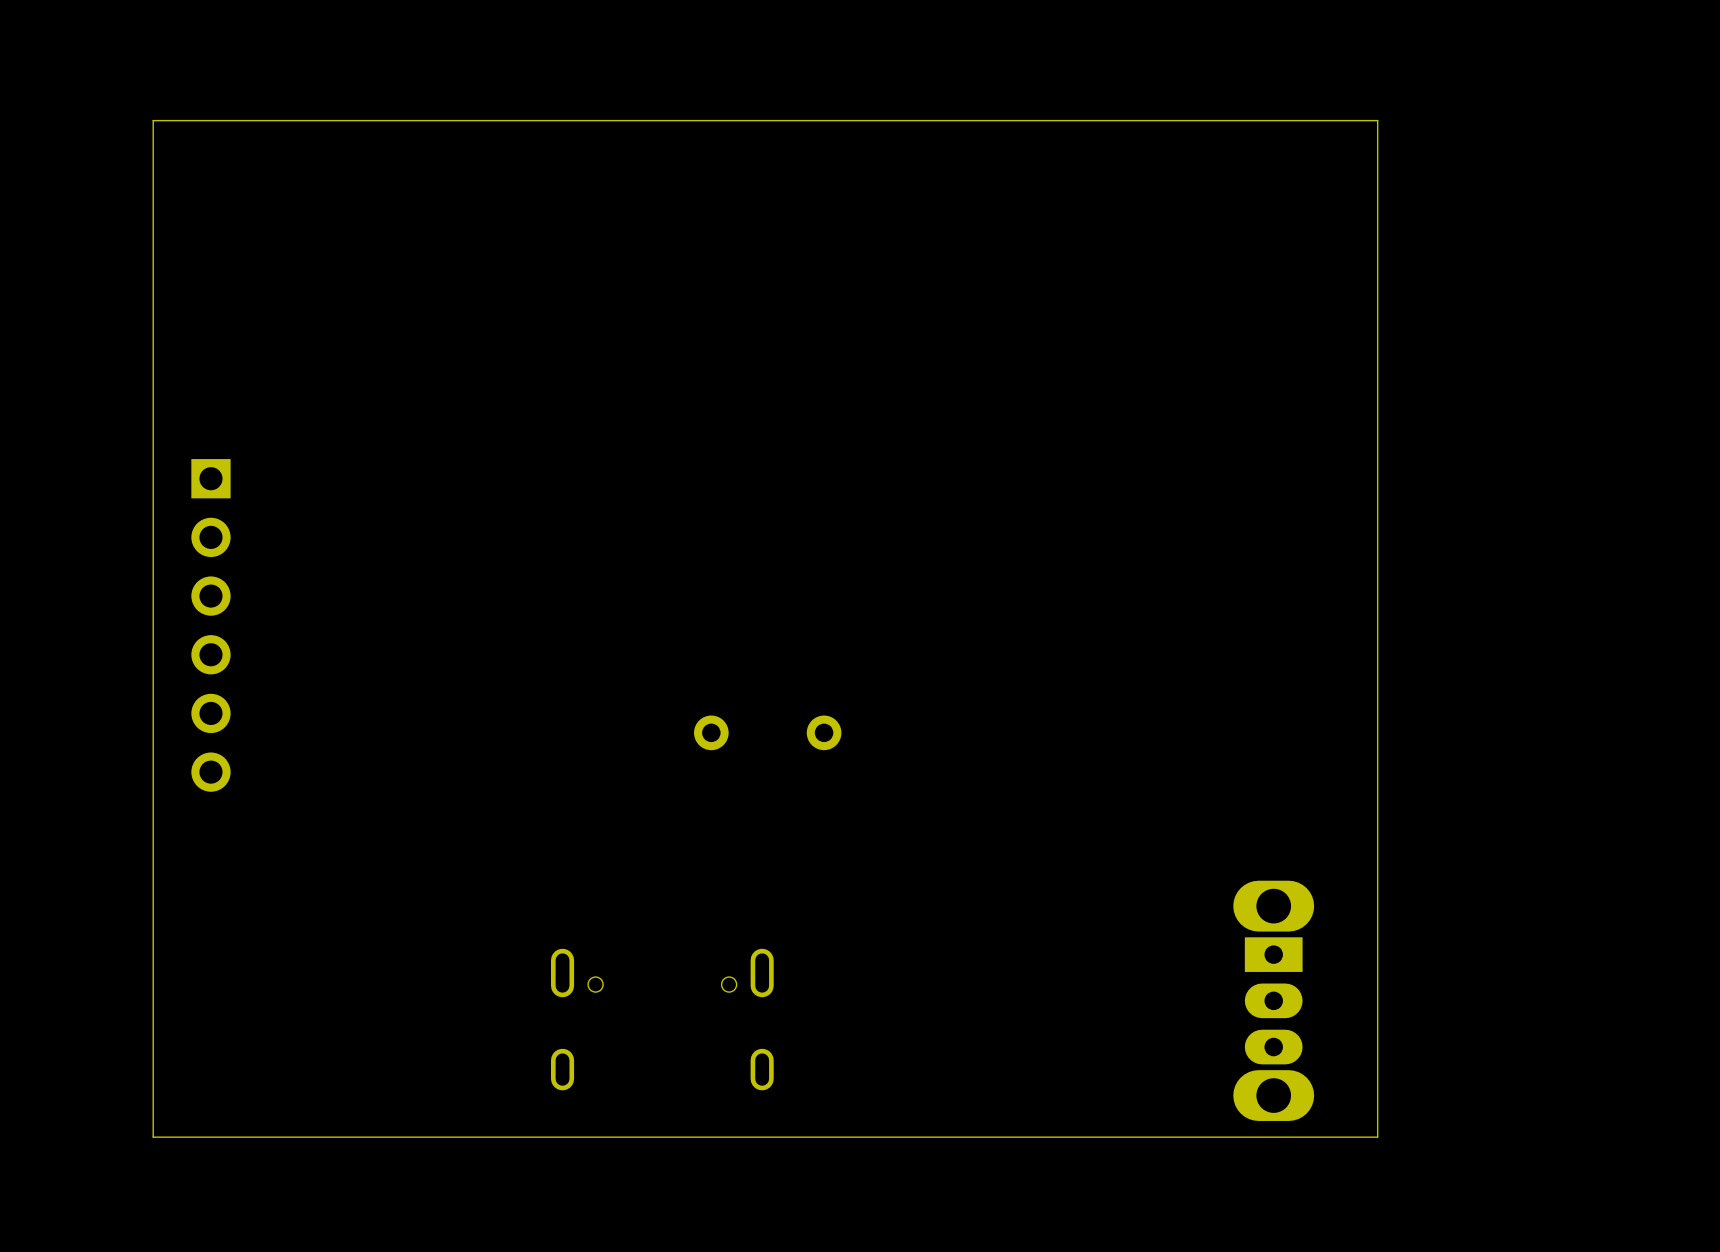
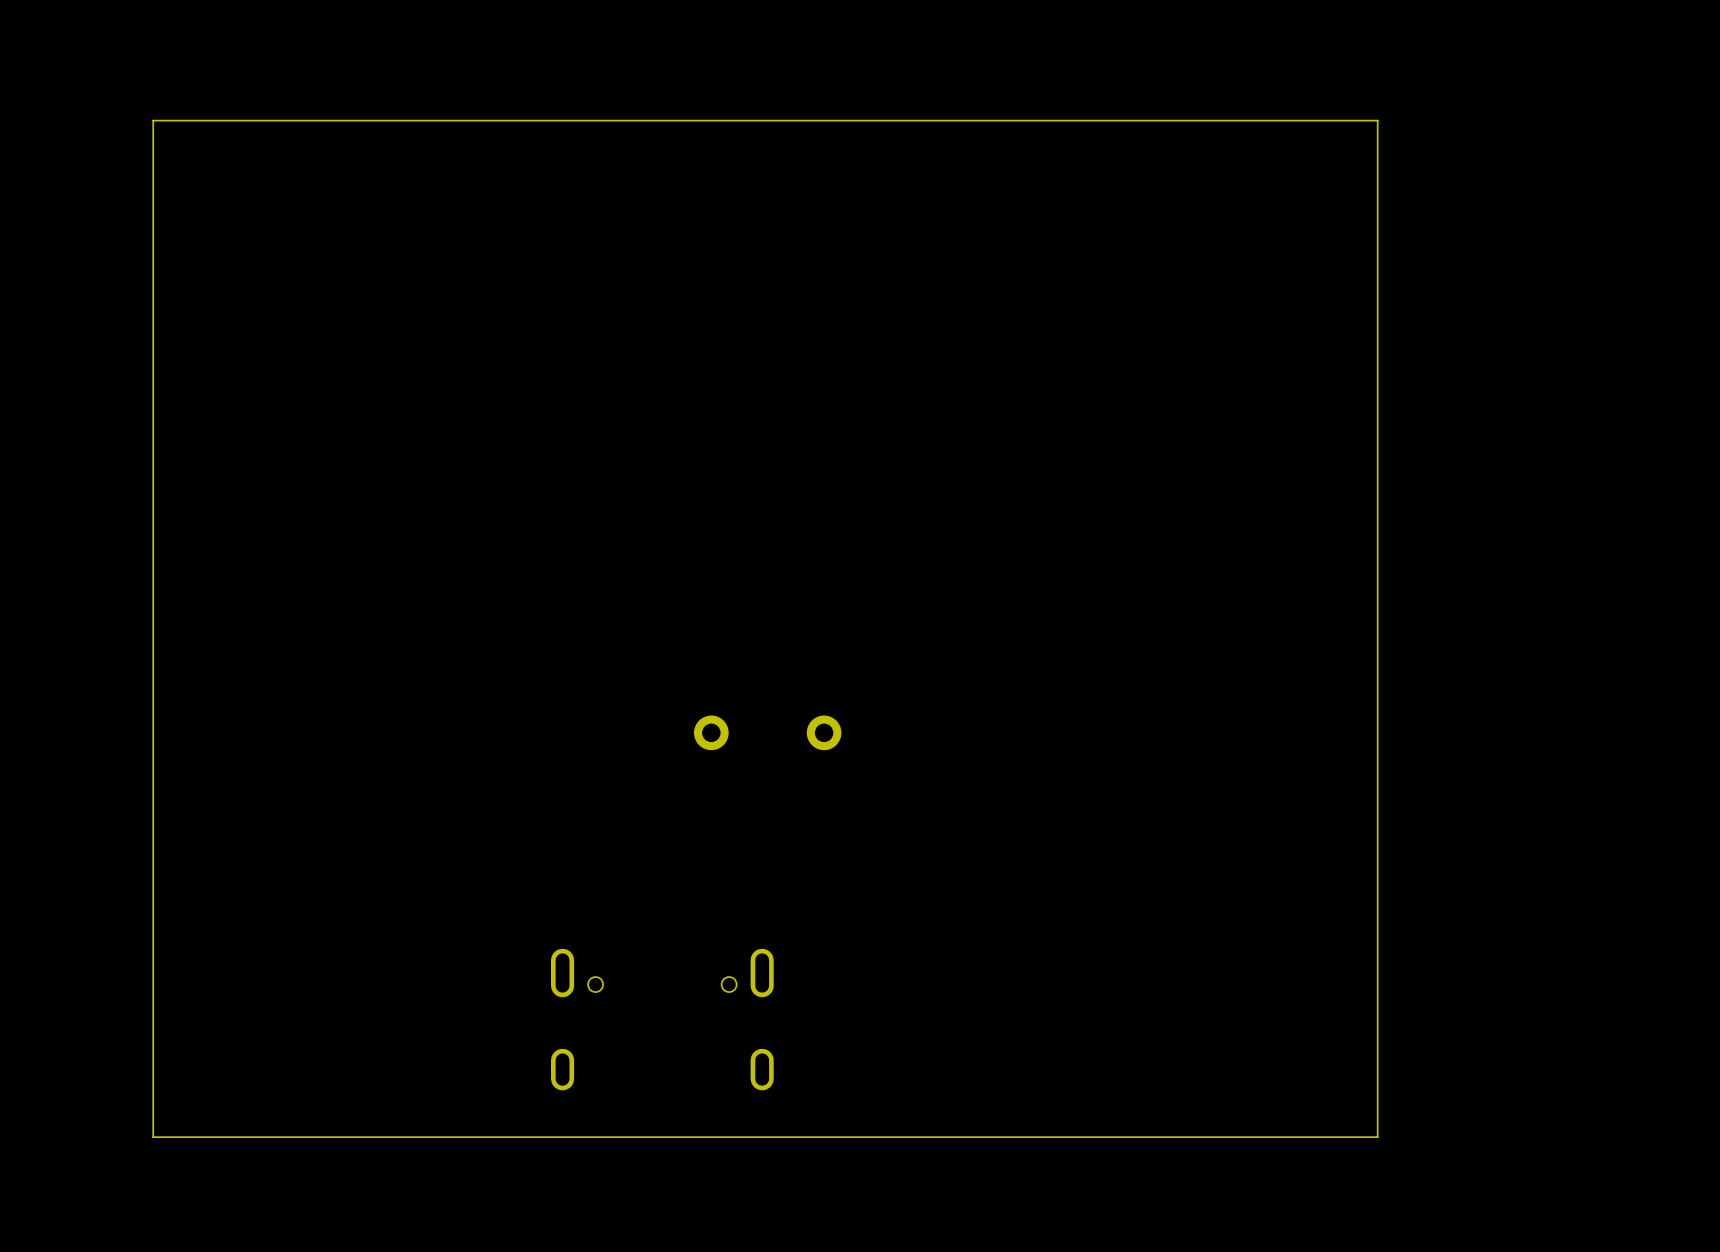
part: (210, 625) -> none
part: (1273, 1000) -> none

